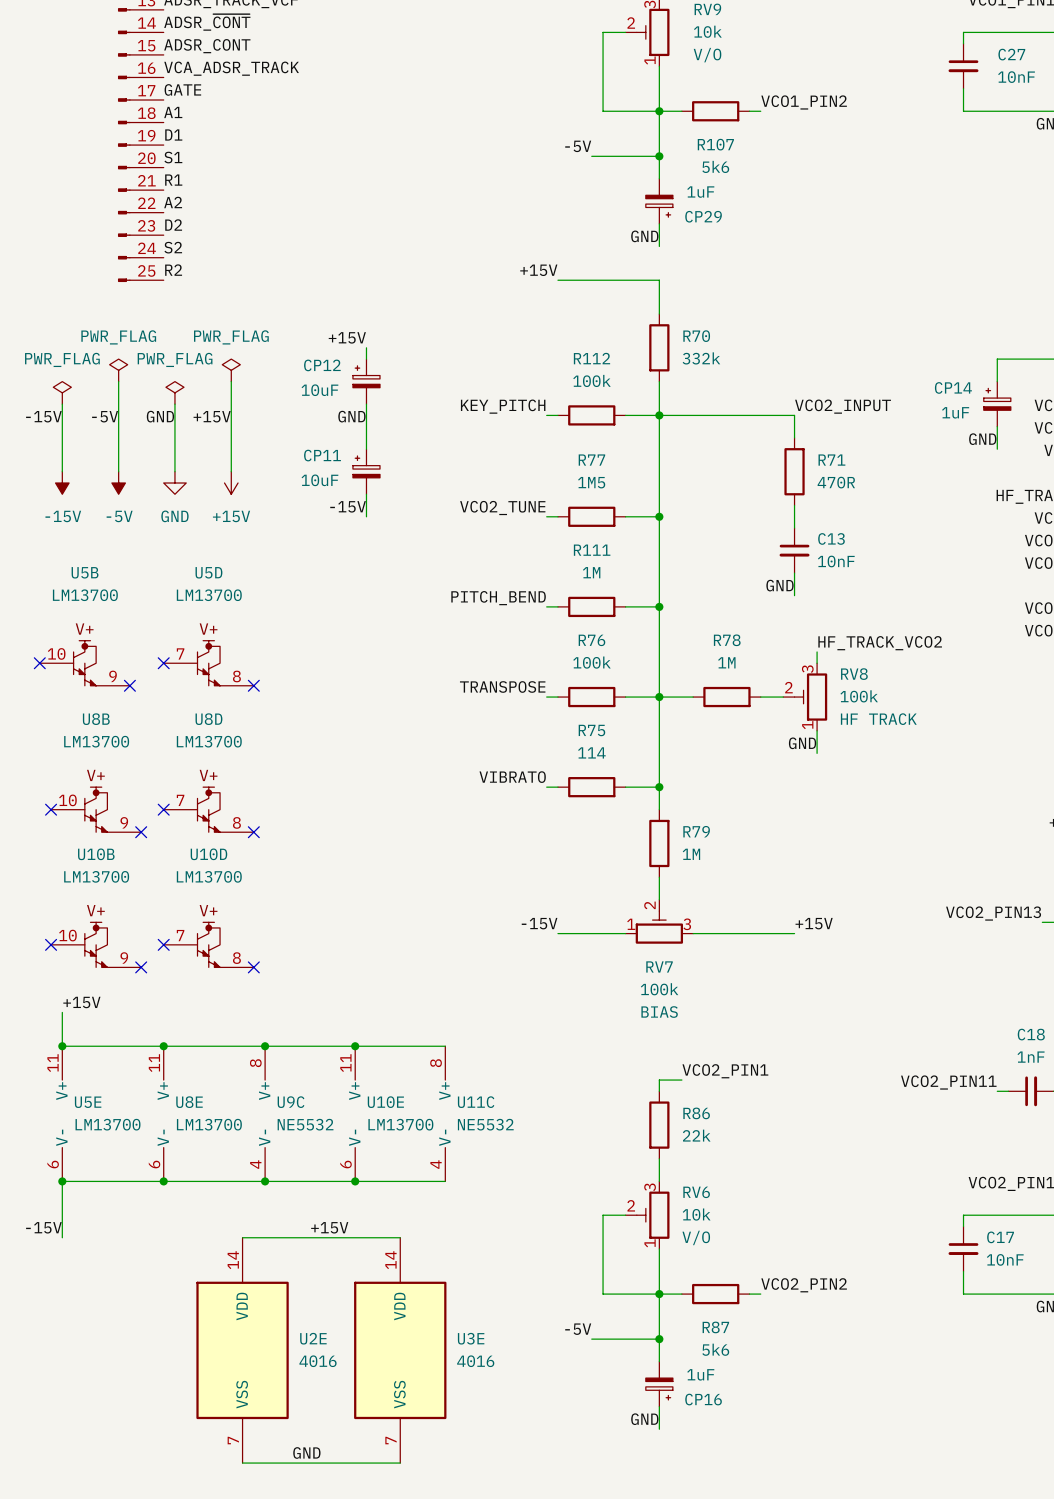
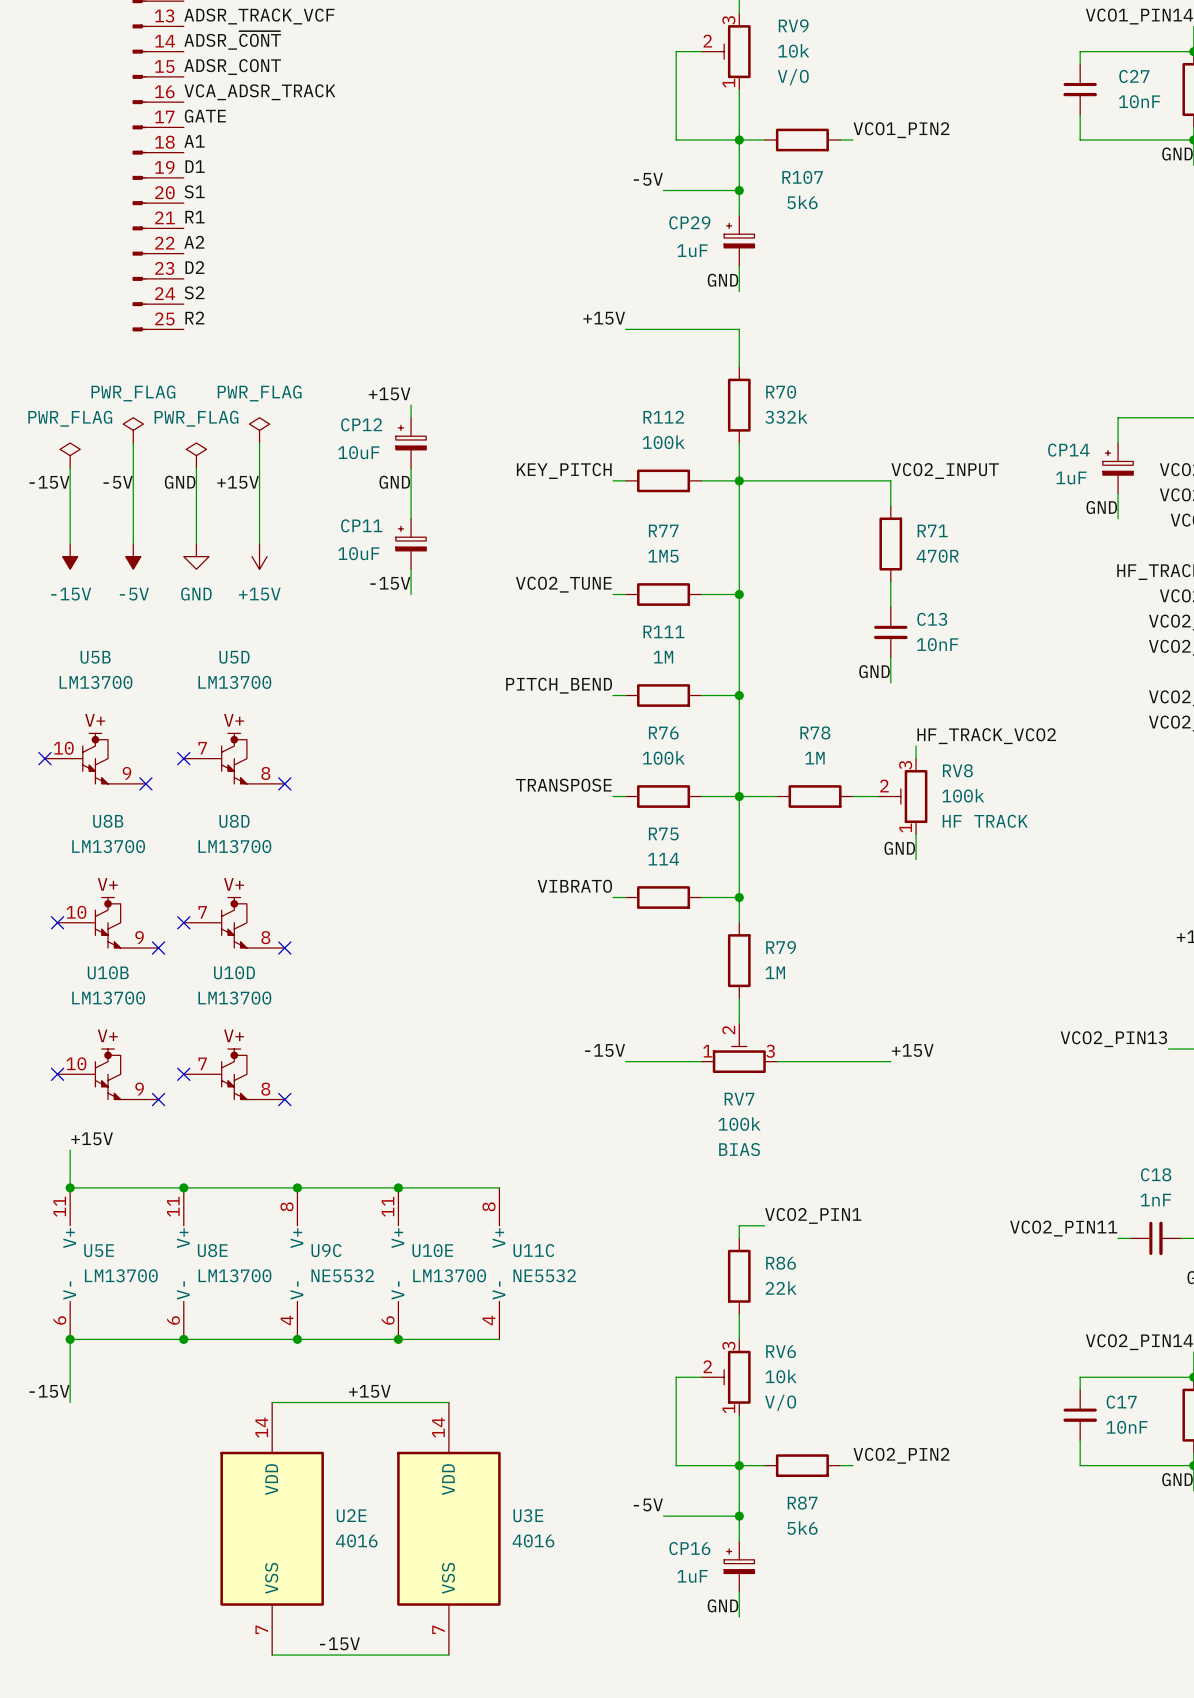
CP29 rotation: 0° (659, 206) -> 180° (739, 235)
CP16 rotation: 0° (659, 1389) -> 180° (739, 1561)
label: GND (306, 1452) -> -15V (339, 1643)

